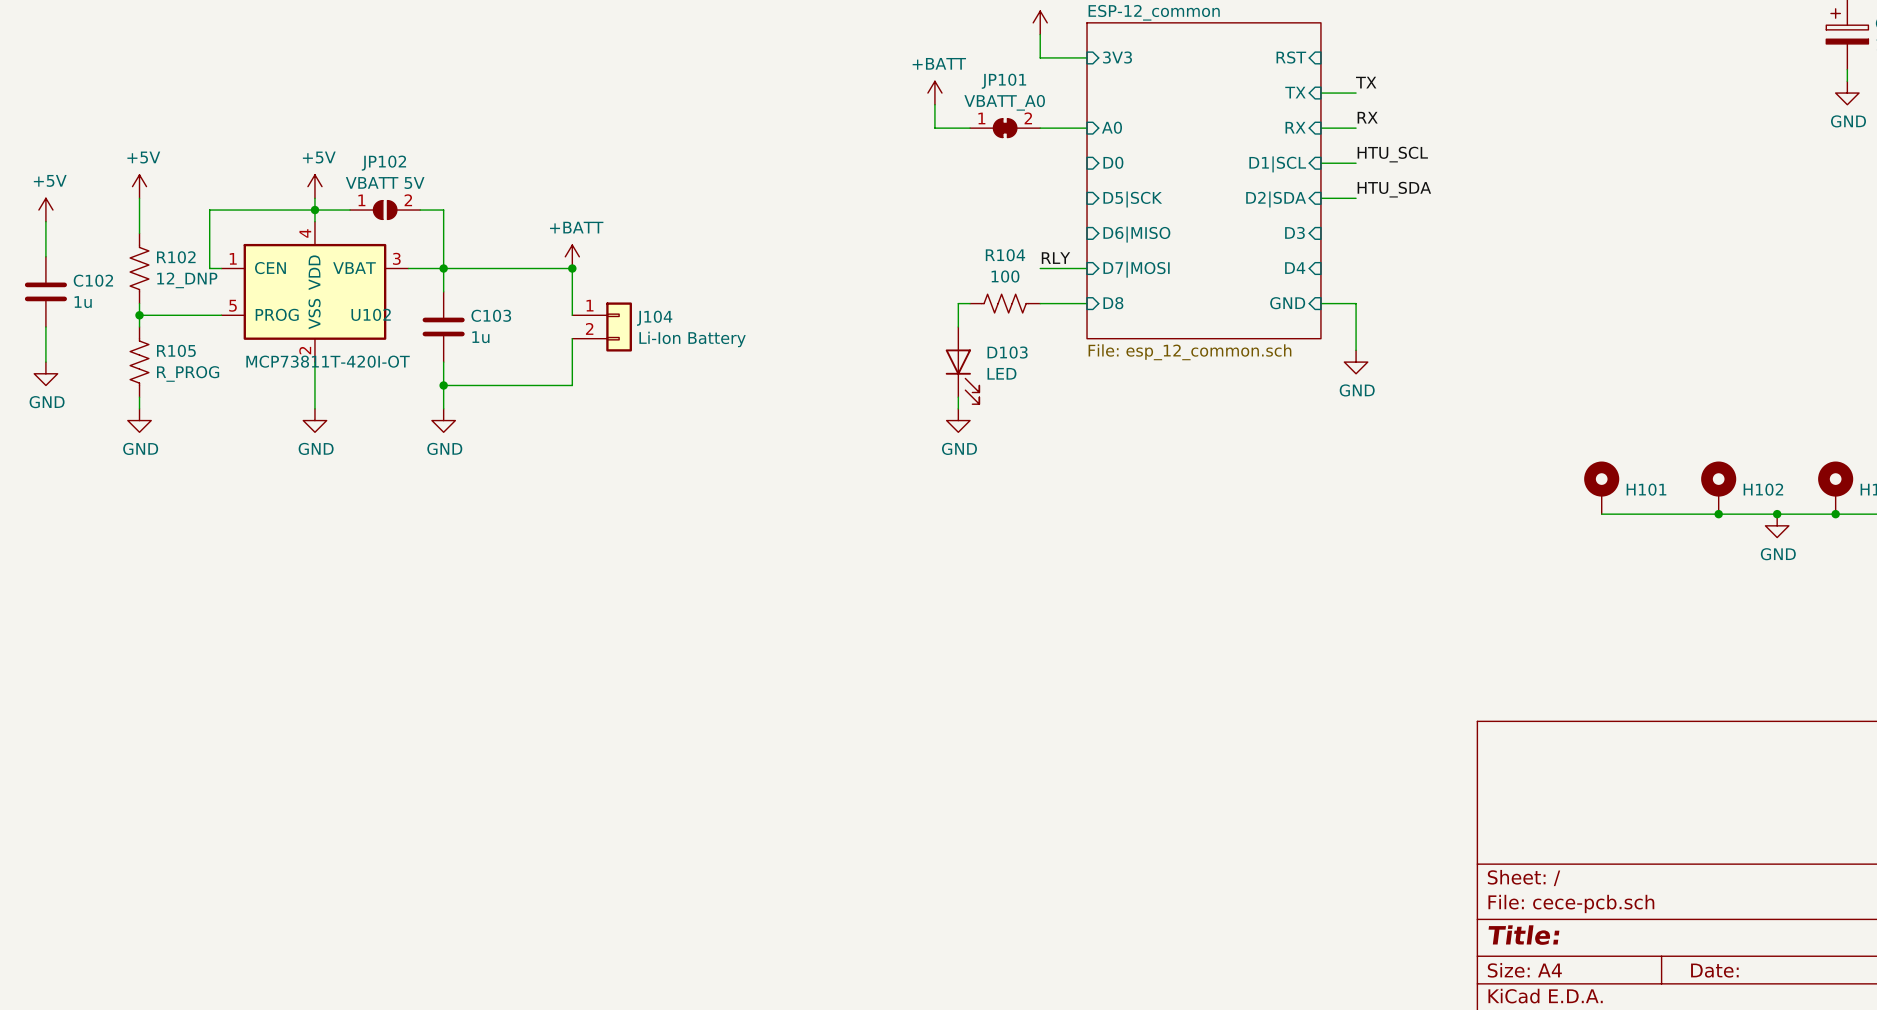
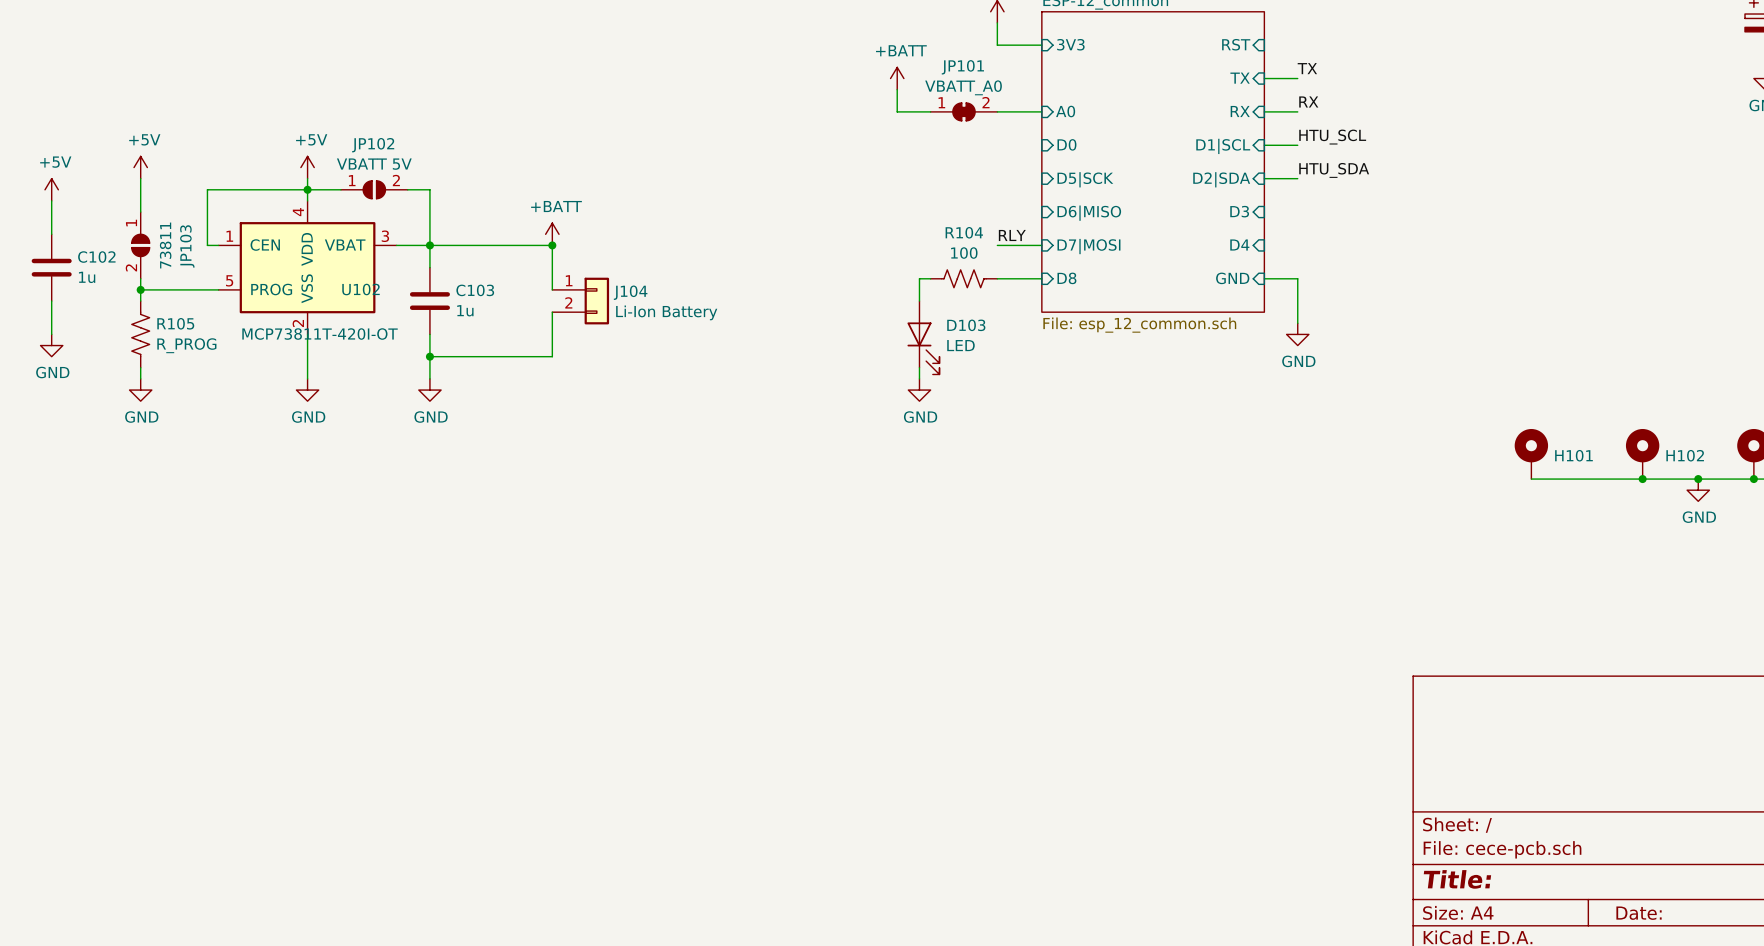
R102: 12_DNP (139, 268) -> none
JP103: none -> 73811 (140, 245)

